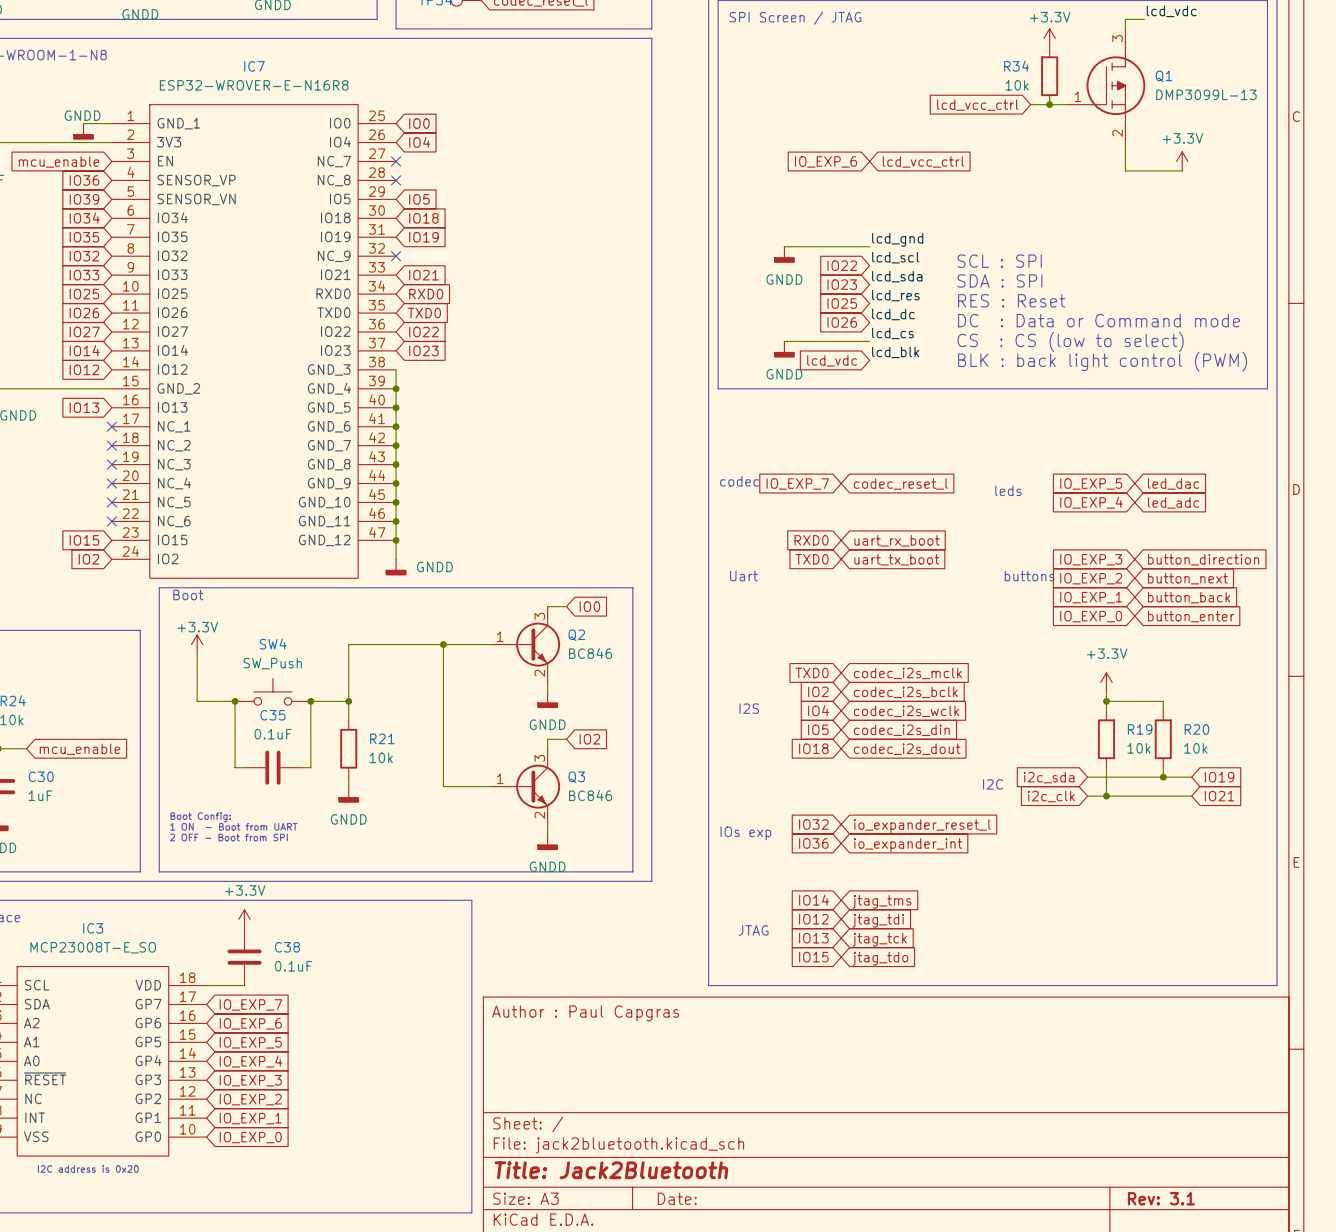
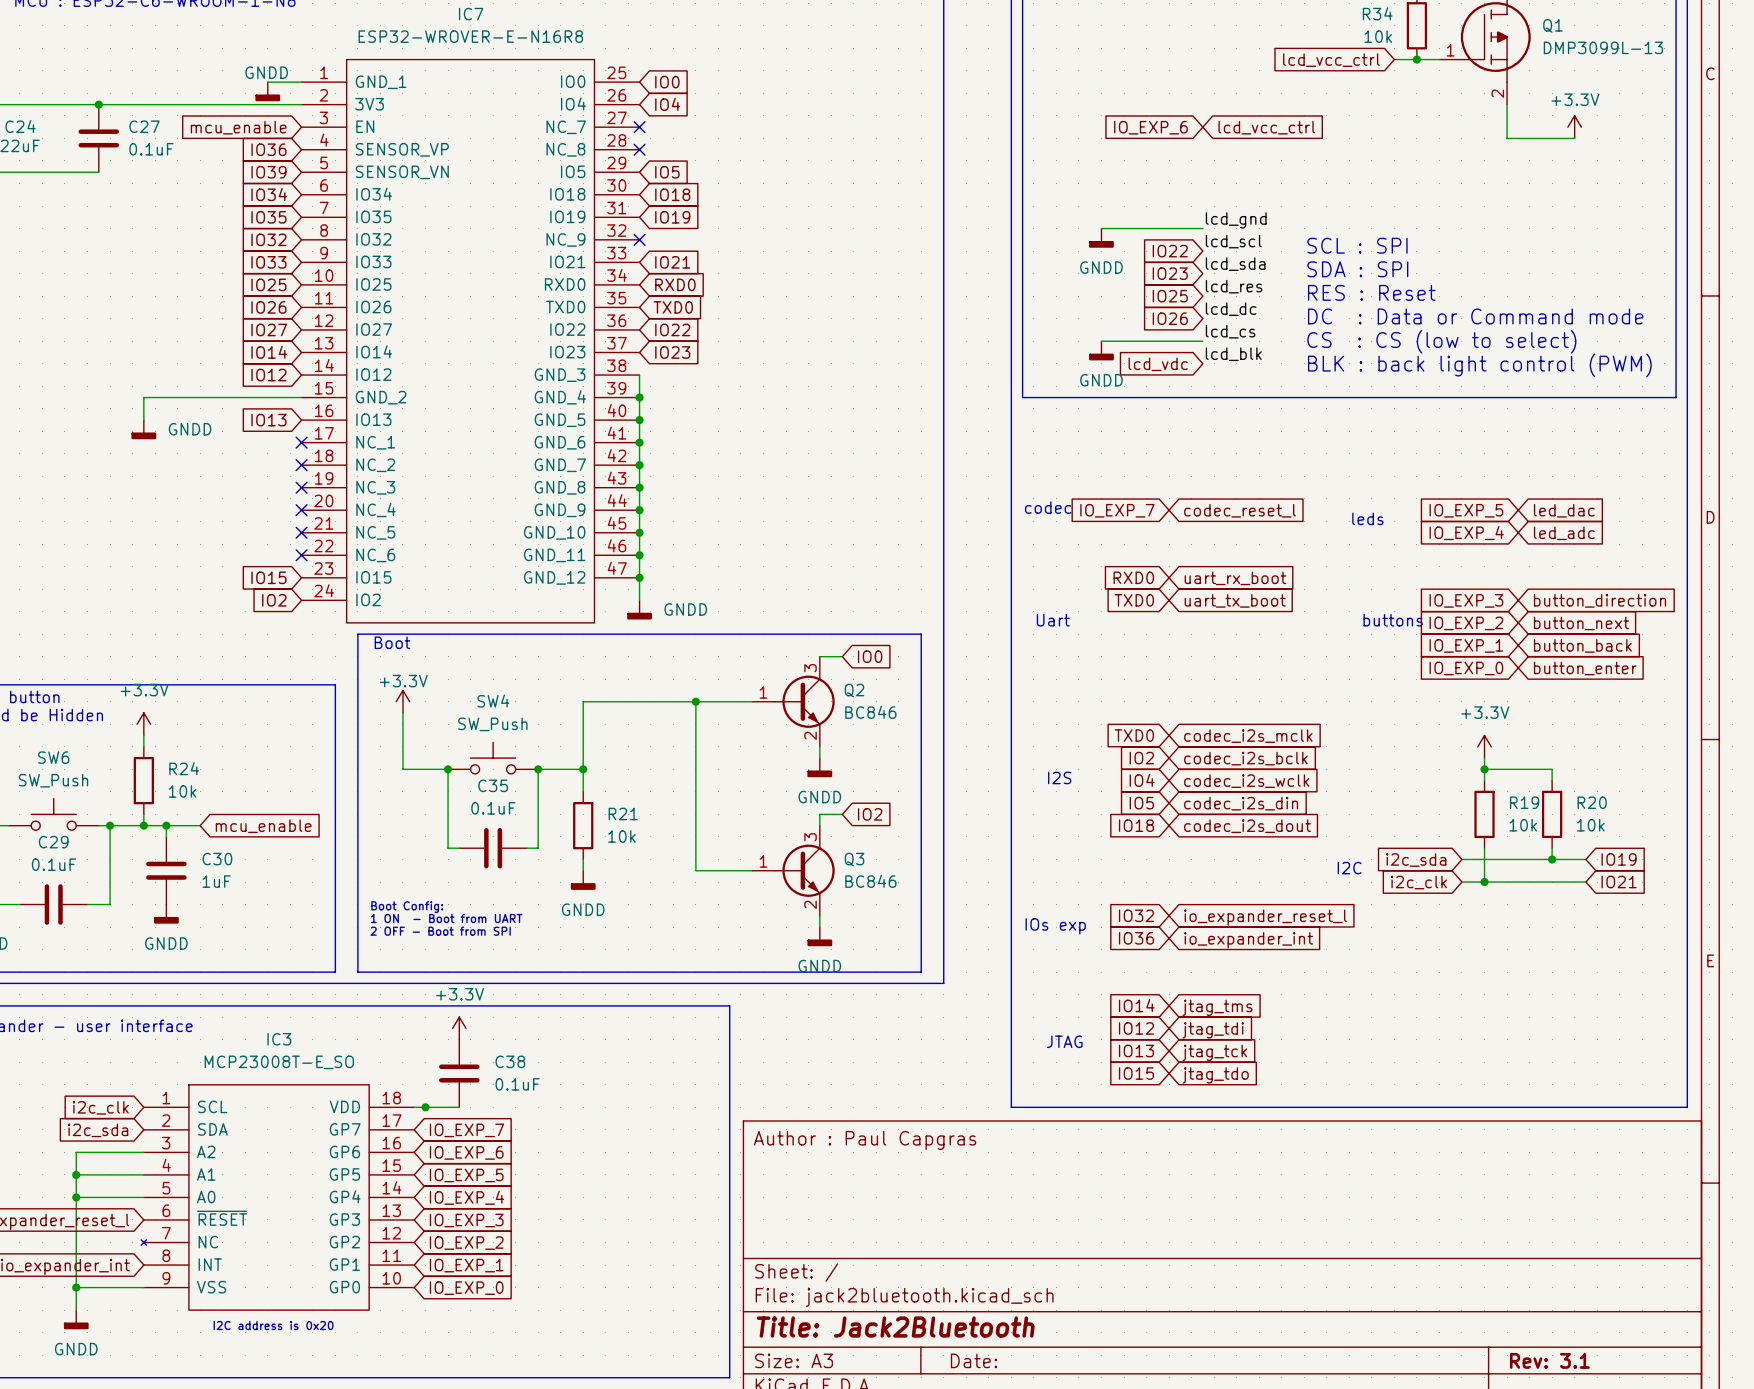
junction: none -> (425, 1107)

